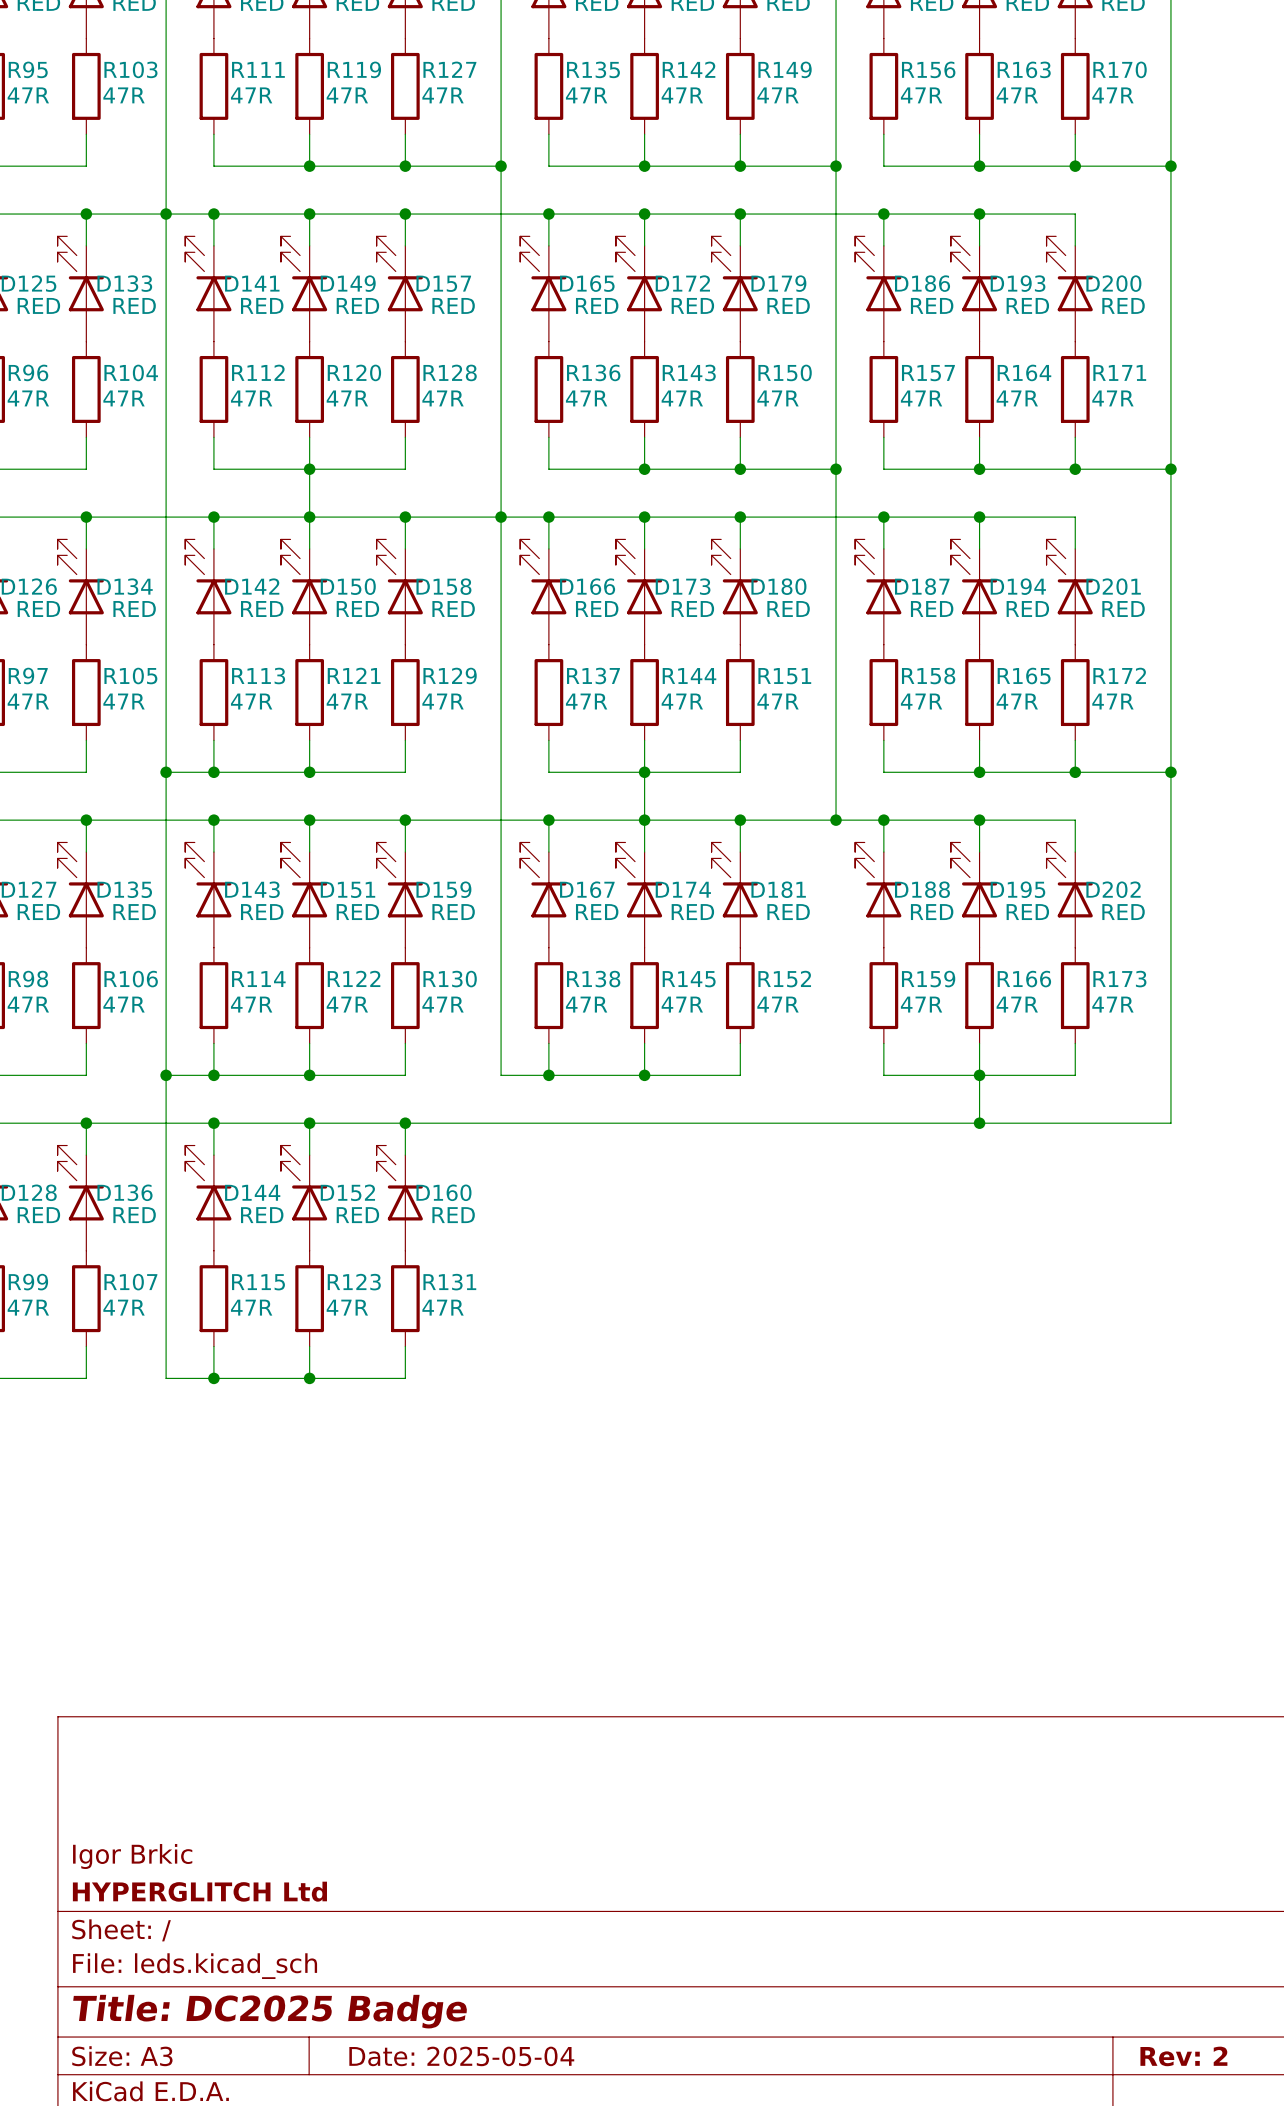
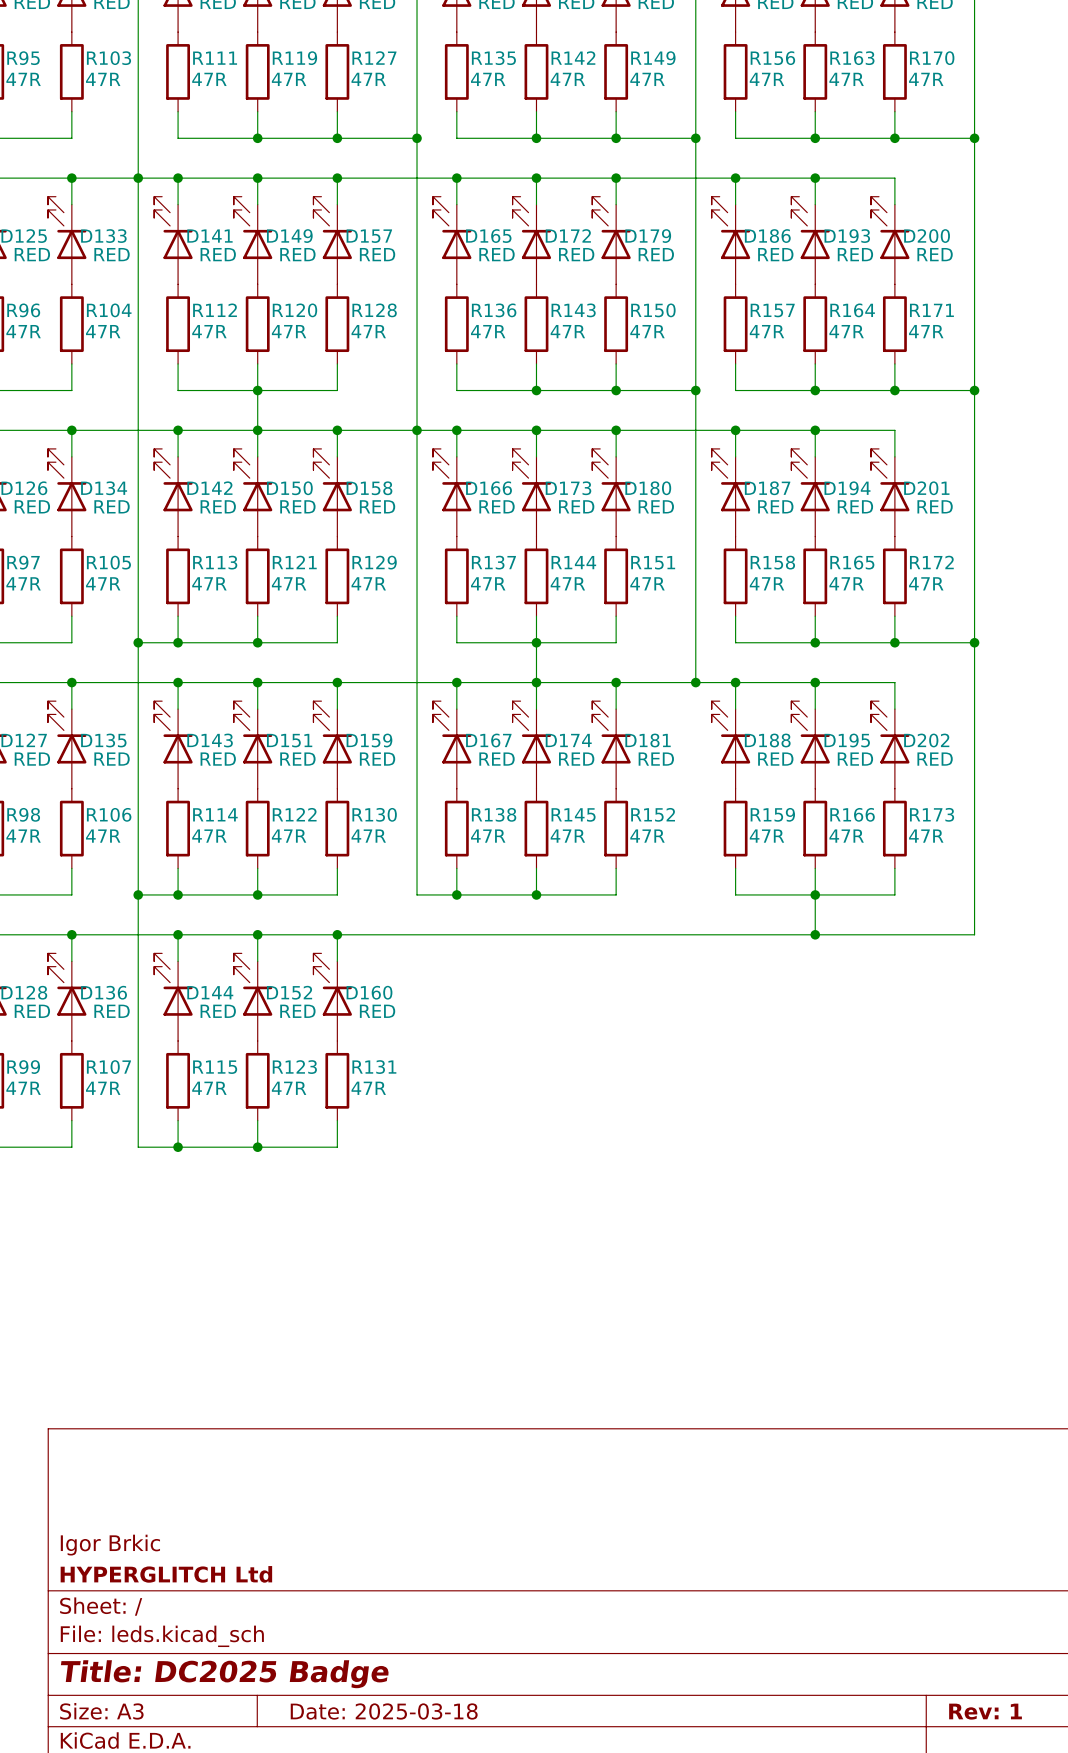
title block: Date: 2025-05-04 (461, 2056) -> Date: 2025-03-18 (384, 1711)
title block: Rev: 2 (1183, 2056) -> Rev: 1 (985, 1711)

